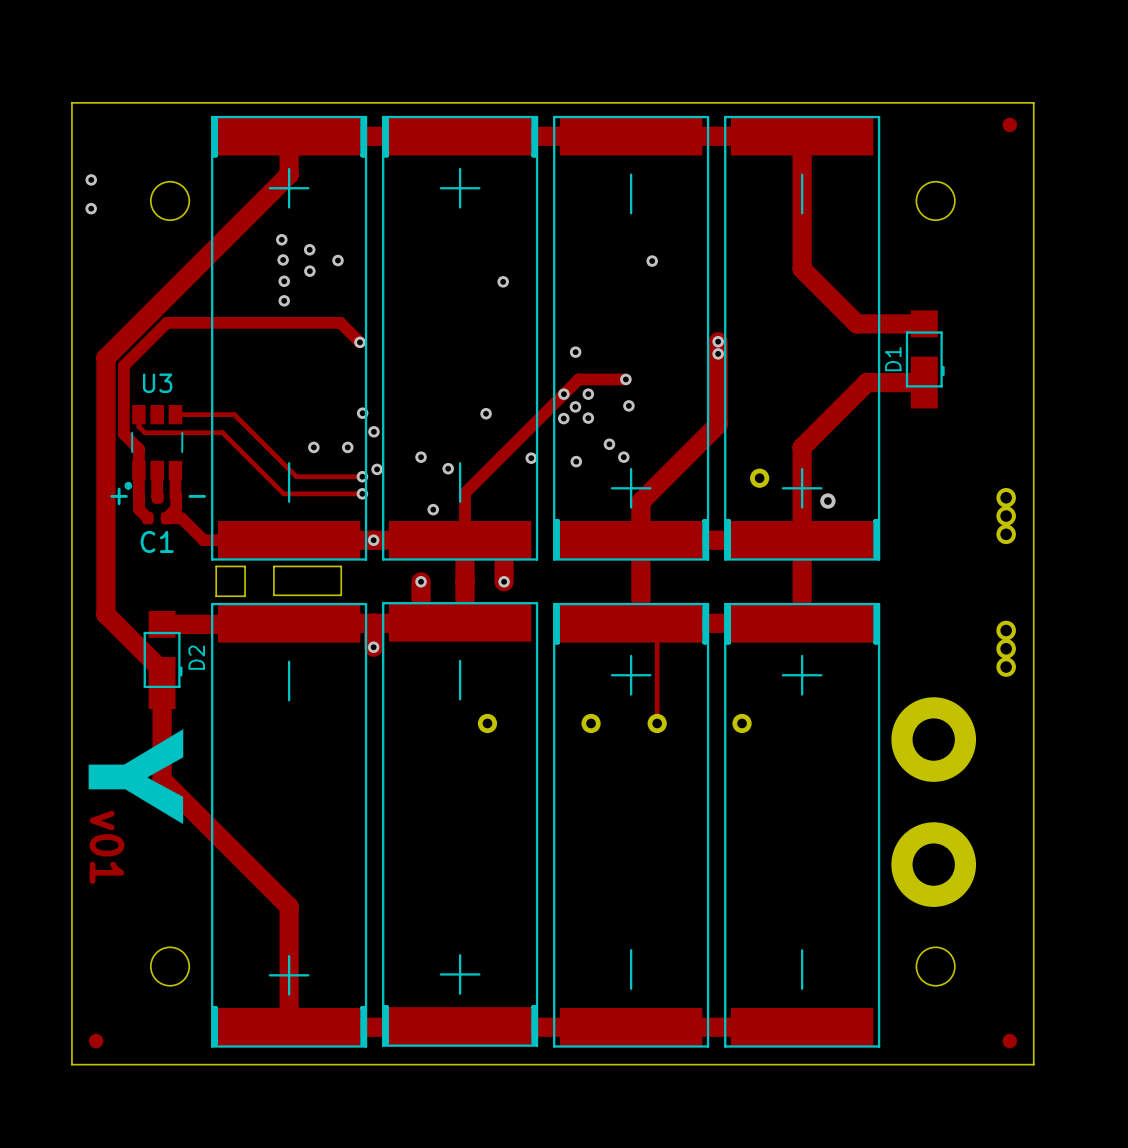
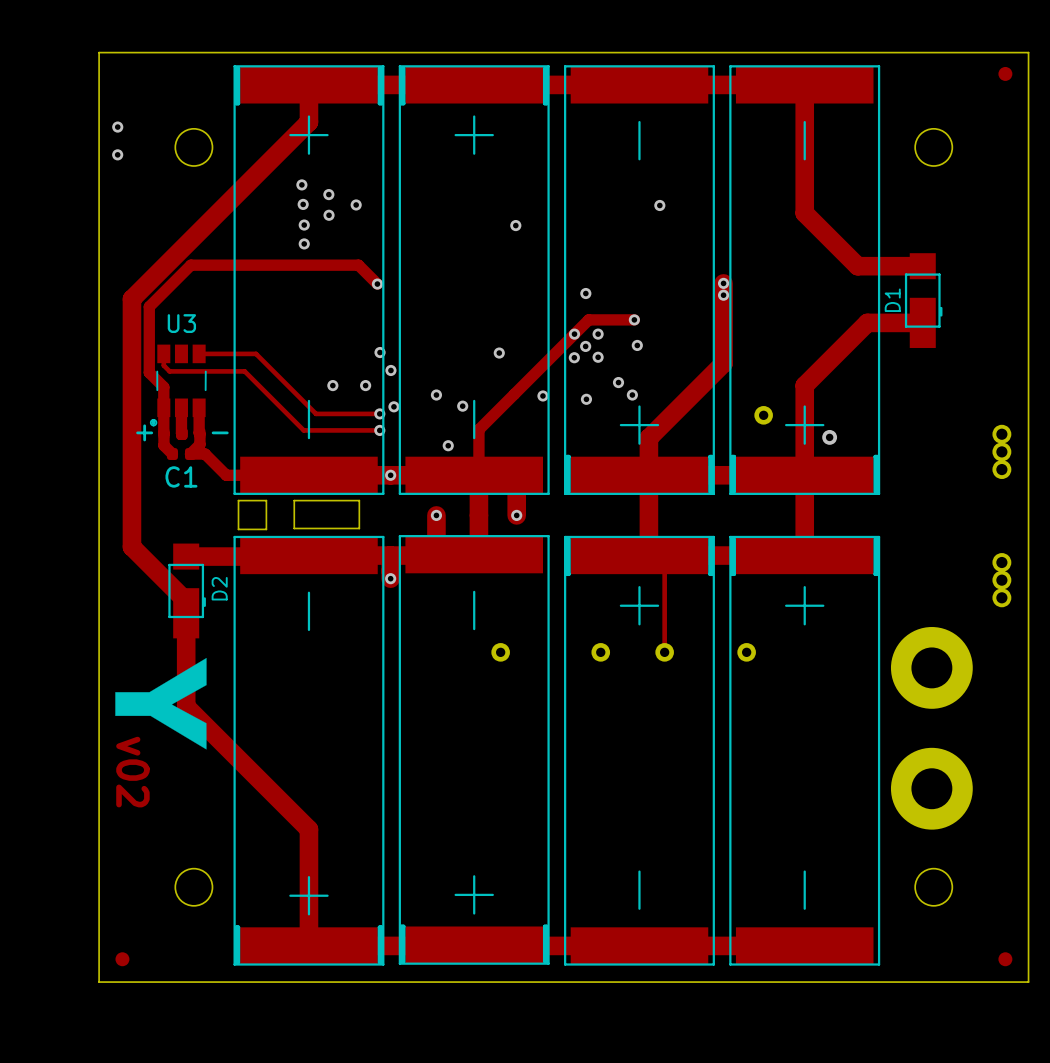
text: v01 (106, 847) -> v02 (132, 772)

